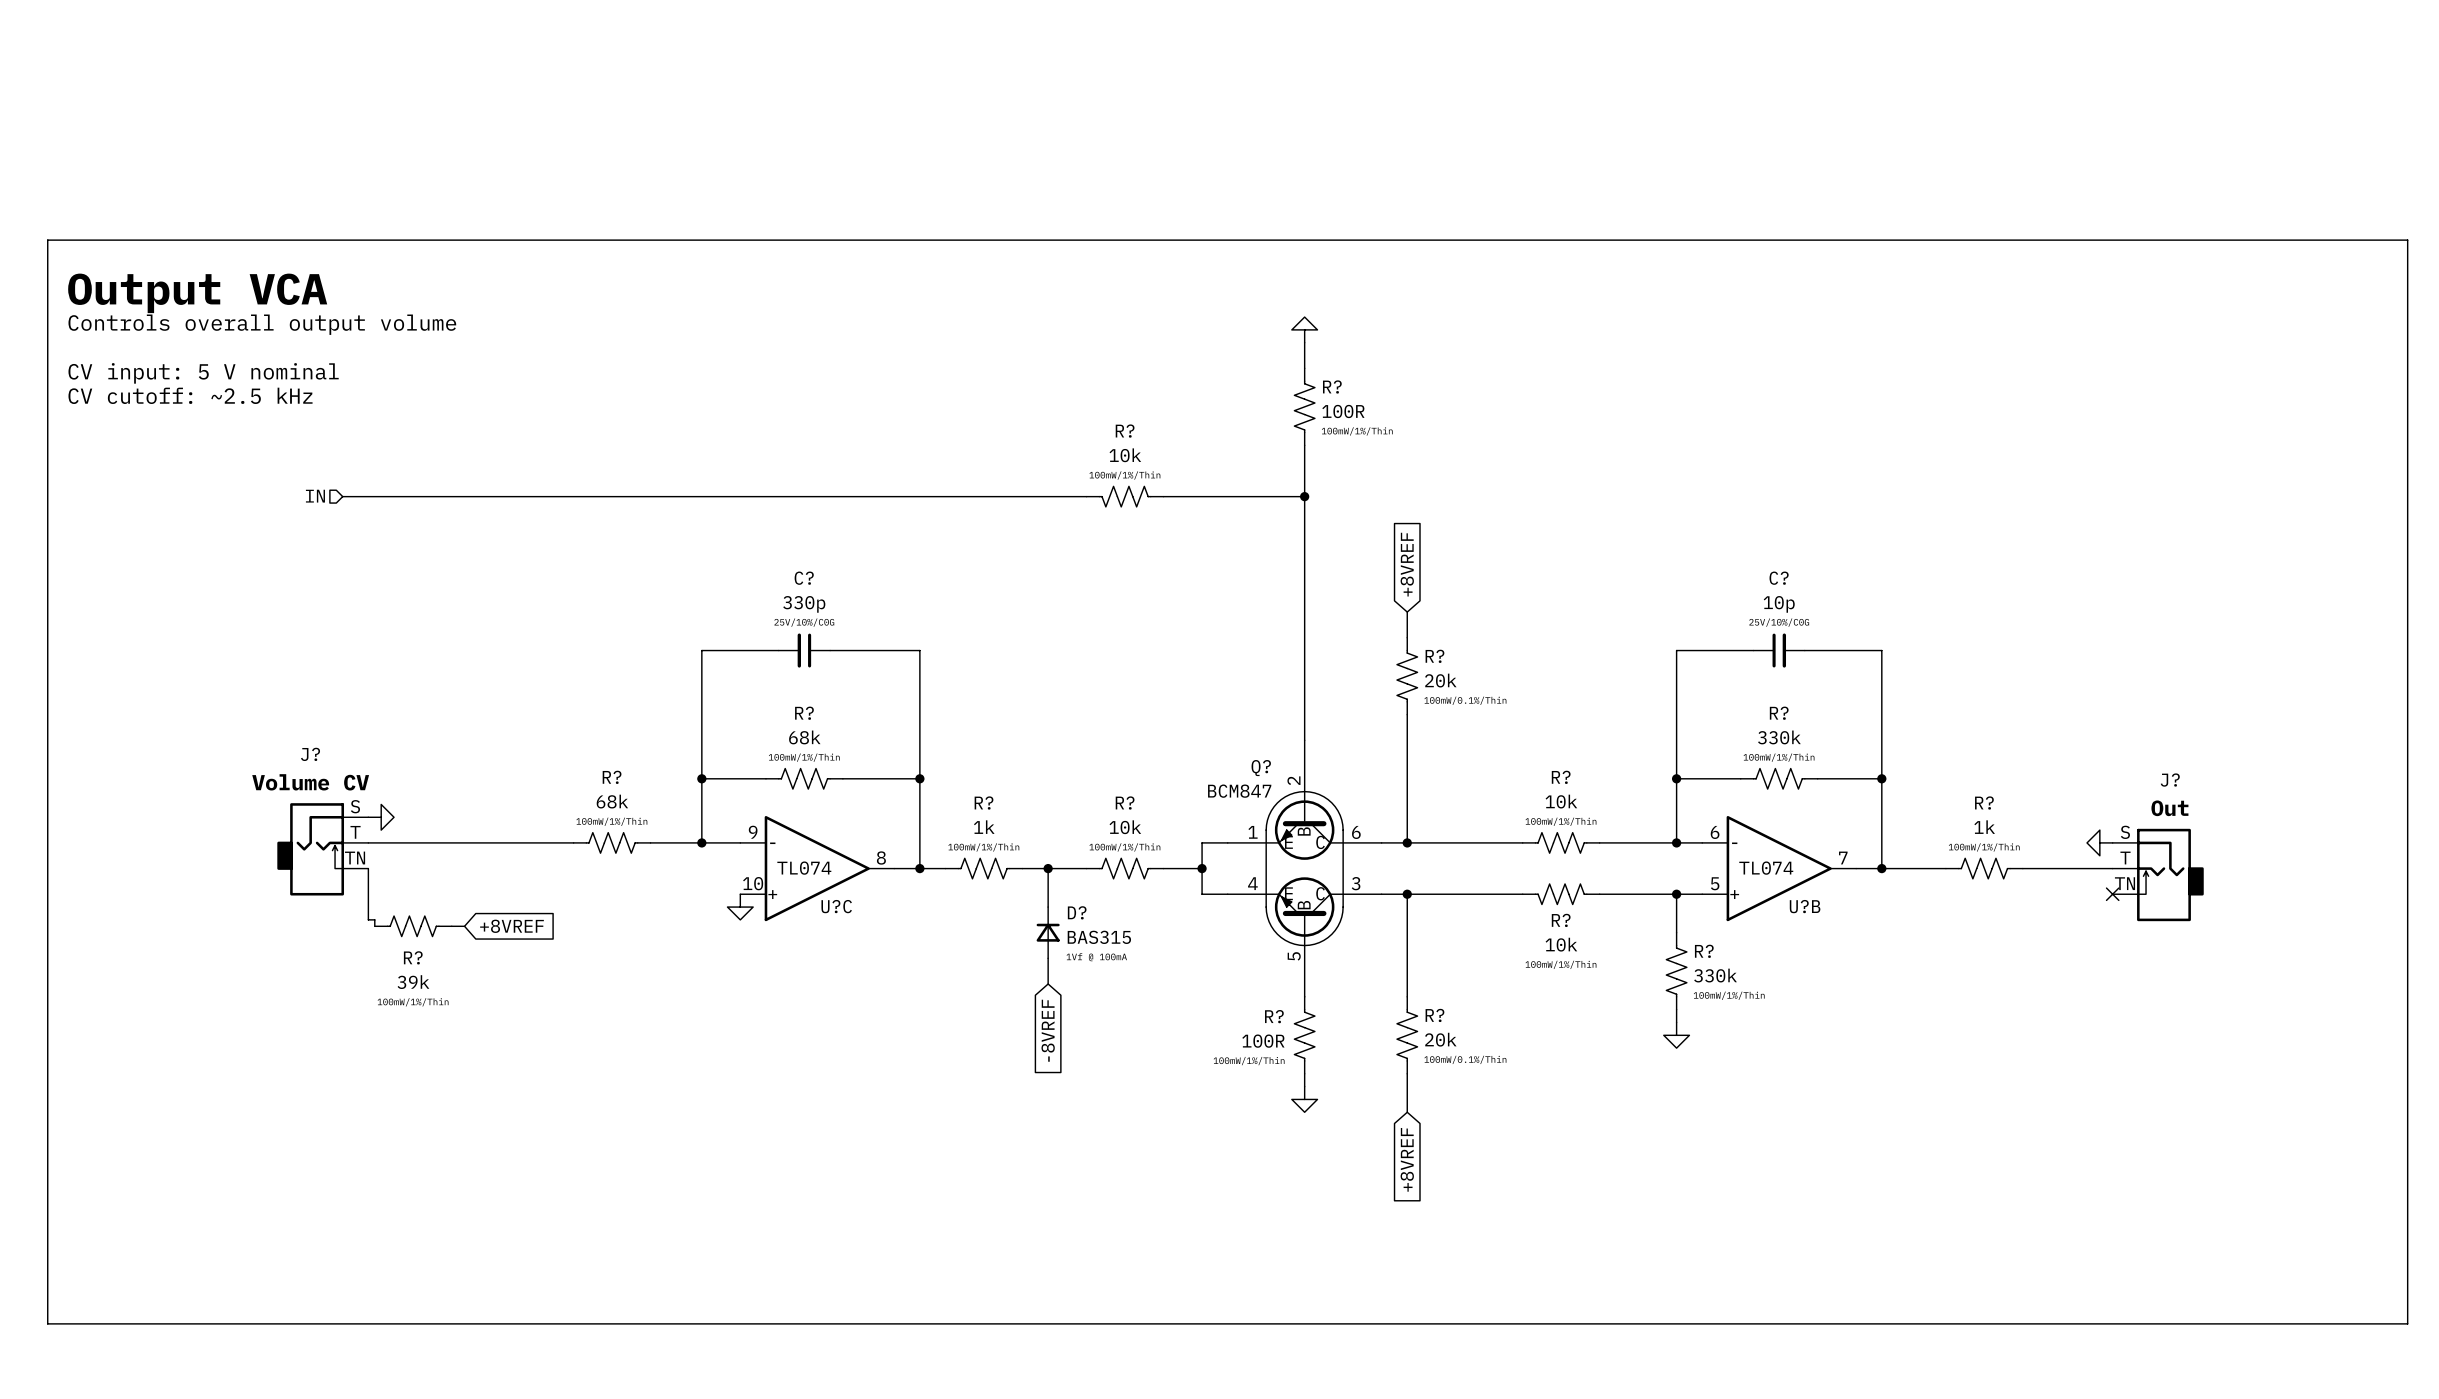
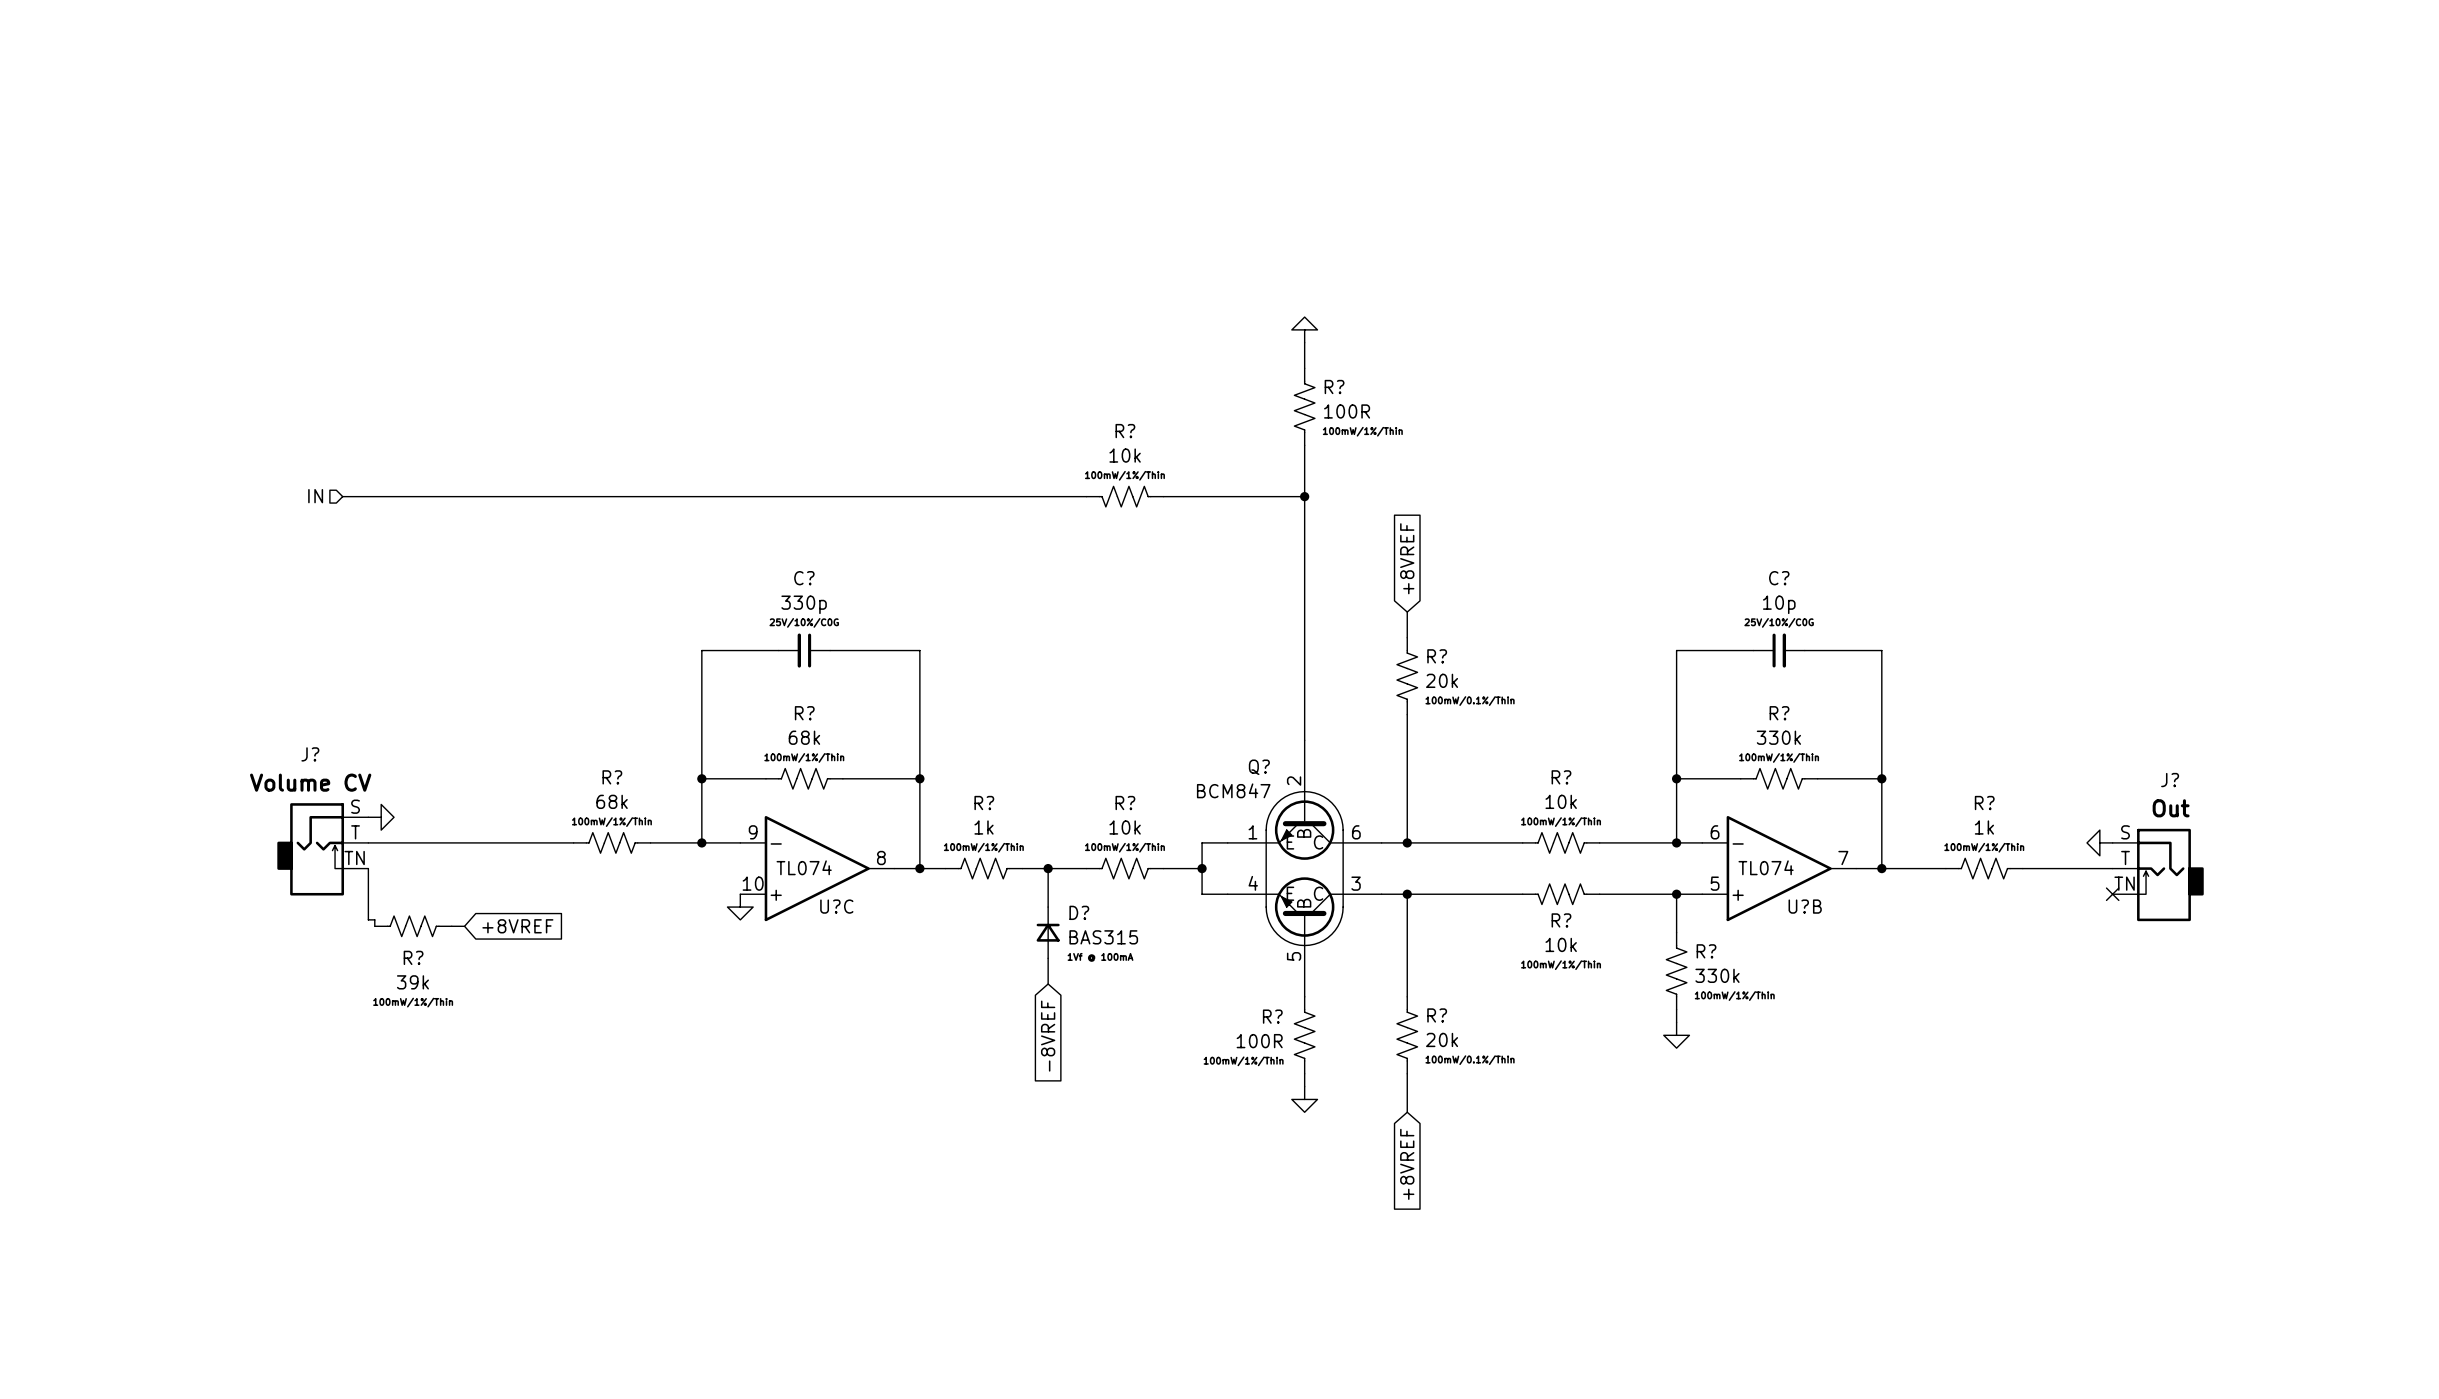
line: (47, 240) (2407, 240) (2407, 1323) (47, 1323) (47, 240) -> none
text: Output VCA (197, 293) -> none
text: Controls overall output volume (262, 324) -> none
text: CV input: 5 V nominal (203, 373) -> none
text: CV cutoff: ~2.5 kHz (190, 395) -> none

